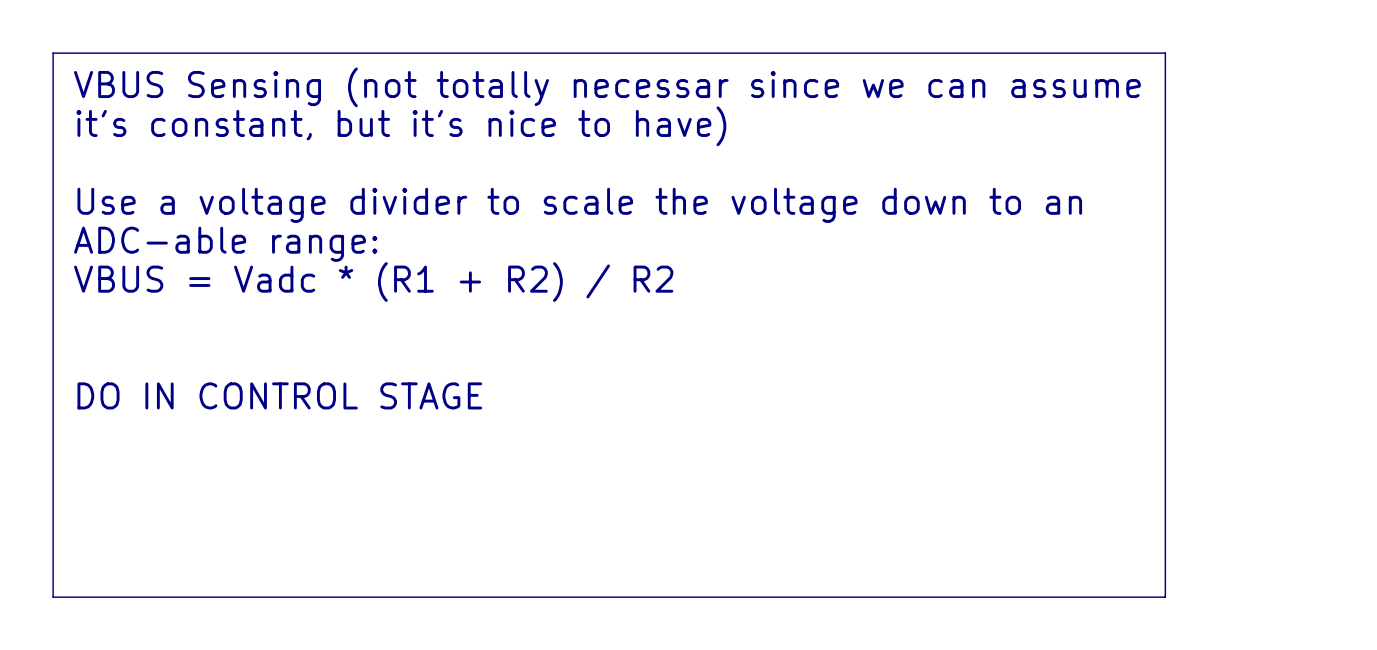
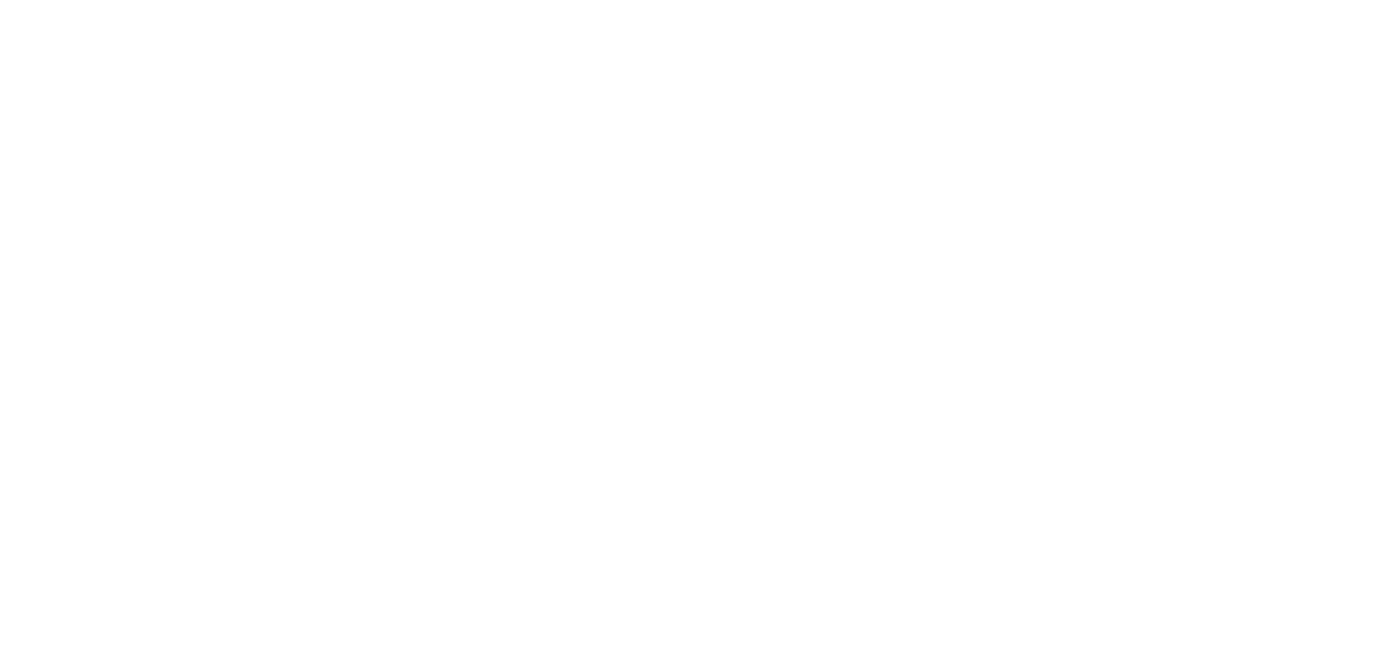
line: (53, 53) (1165, 53) (1165, 597) (53, 597) (53, 53) -> none
text: VBUS Sensing (not totally necessar since we can assume (607, 87) -> none
text: it's constant, but it's nice to have) (401, 126) -> none
text: Use a voltage divider to scale the voltage down to an (579, 205) -> none
text: ADC-able range: (225, 244) -> none
text: VBUS = Vadc * (R1 + R2) / R2 (373, 282) -> none
text: DO IN CONTROL STAGE (279, 395) -> none

